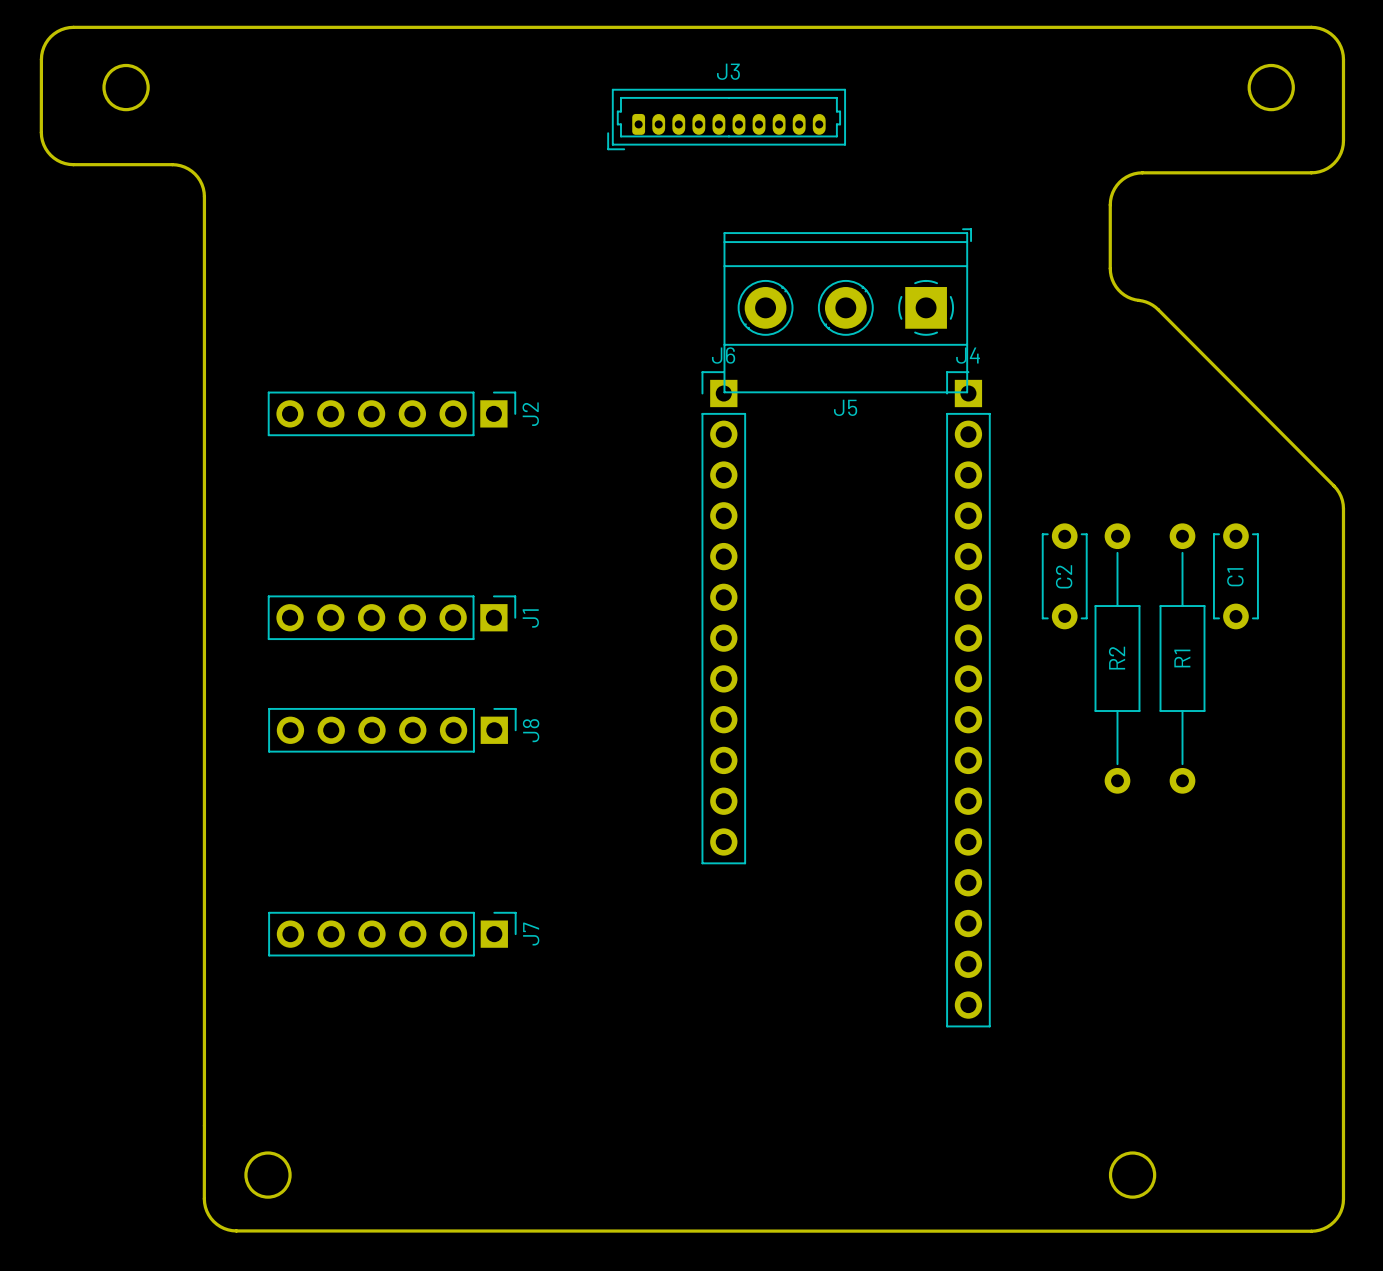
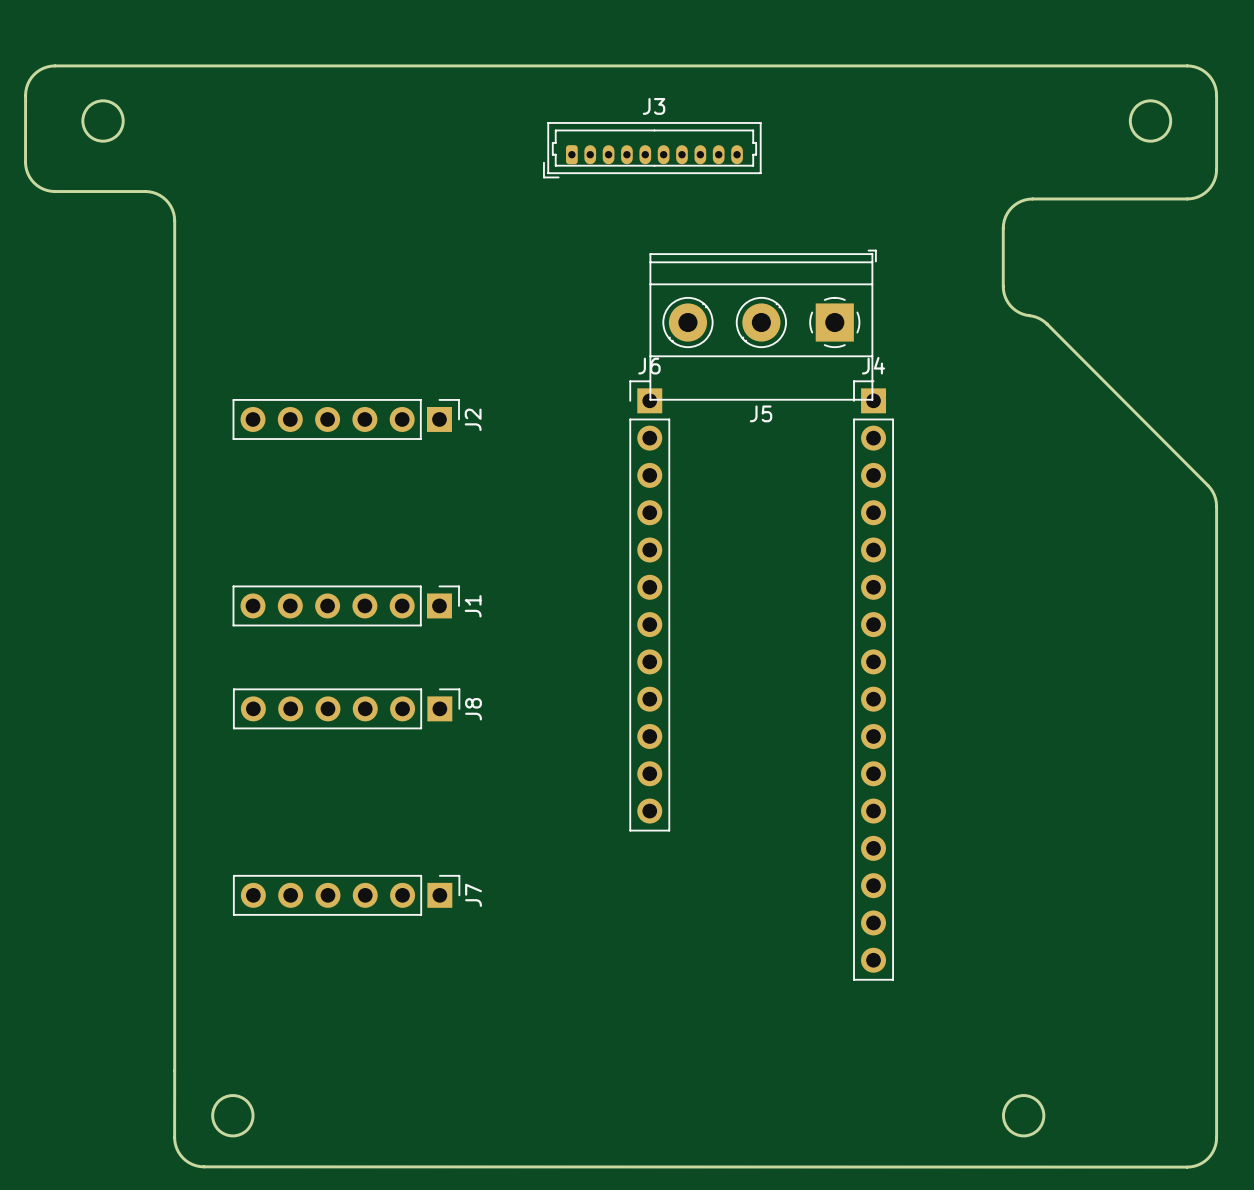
C2: (1064, 576) -> none
C1: (1235, 576) -> none
R2: (1117, 658) -> none
R1: (1182, 658) -> none

